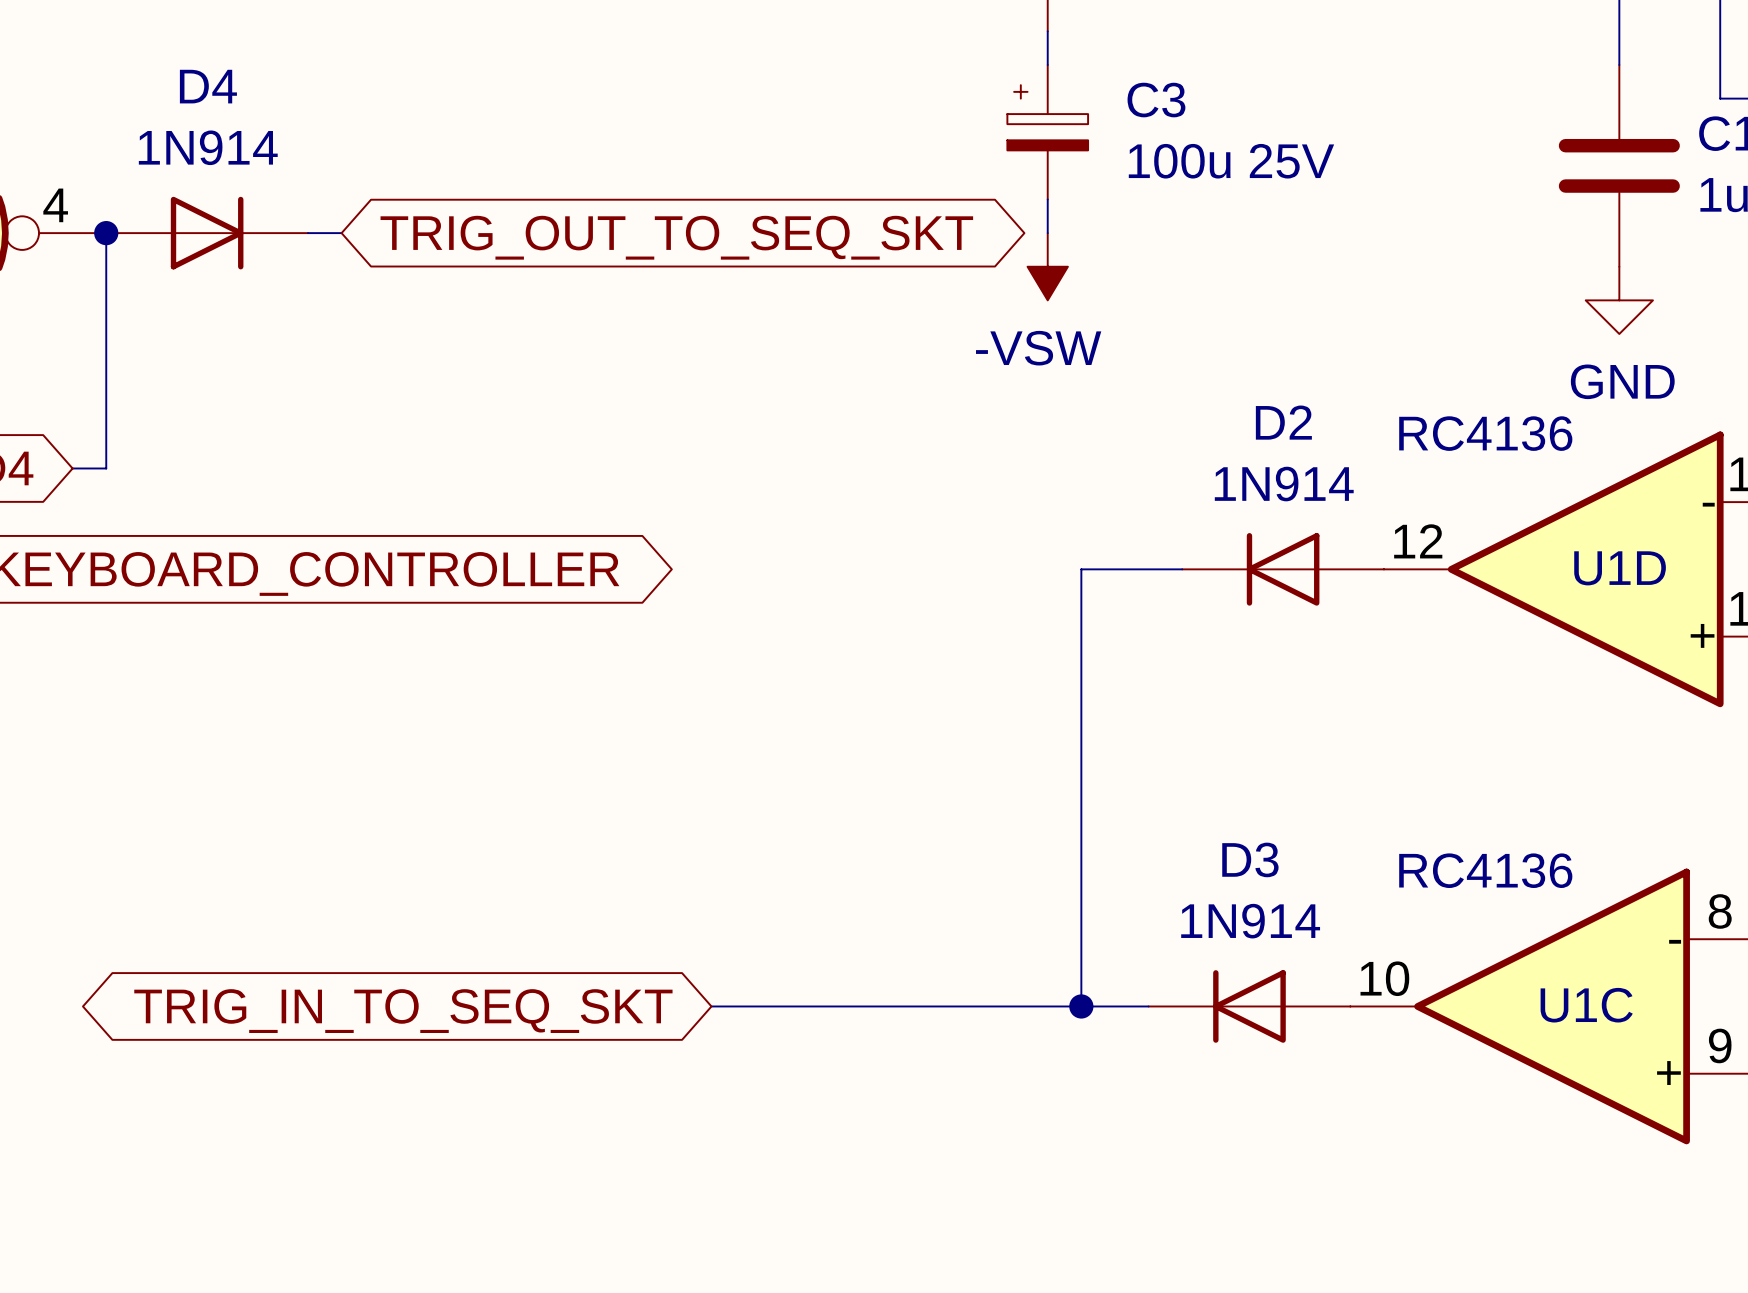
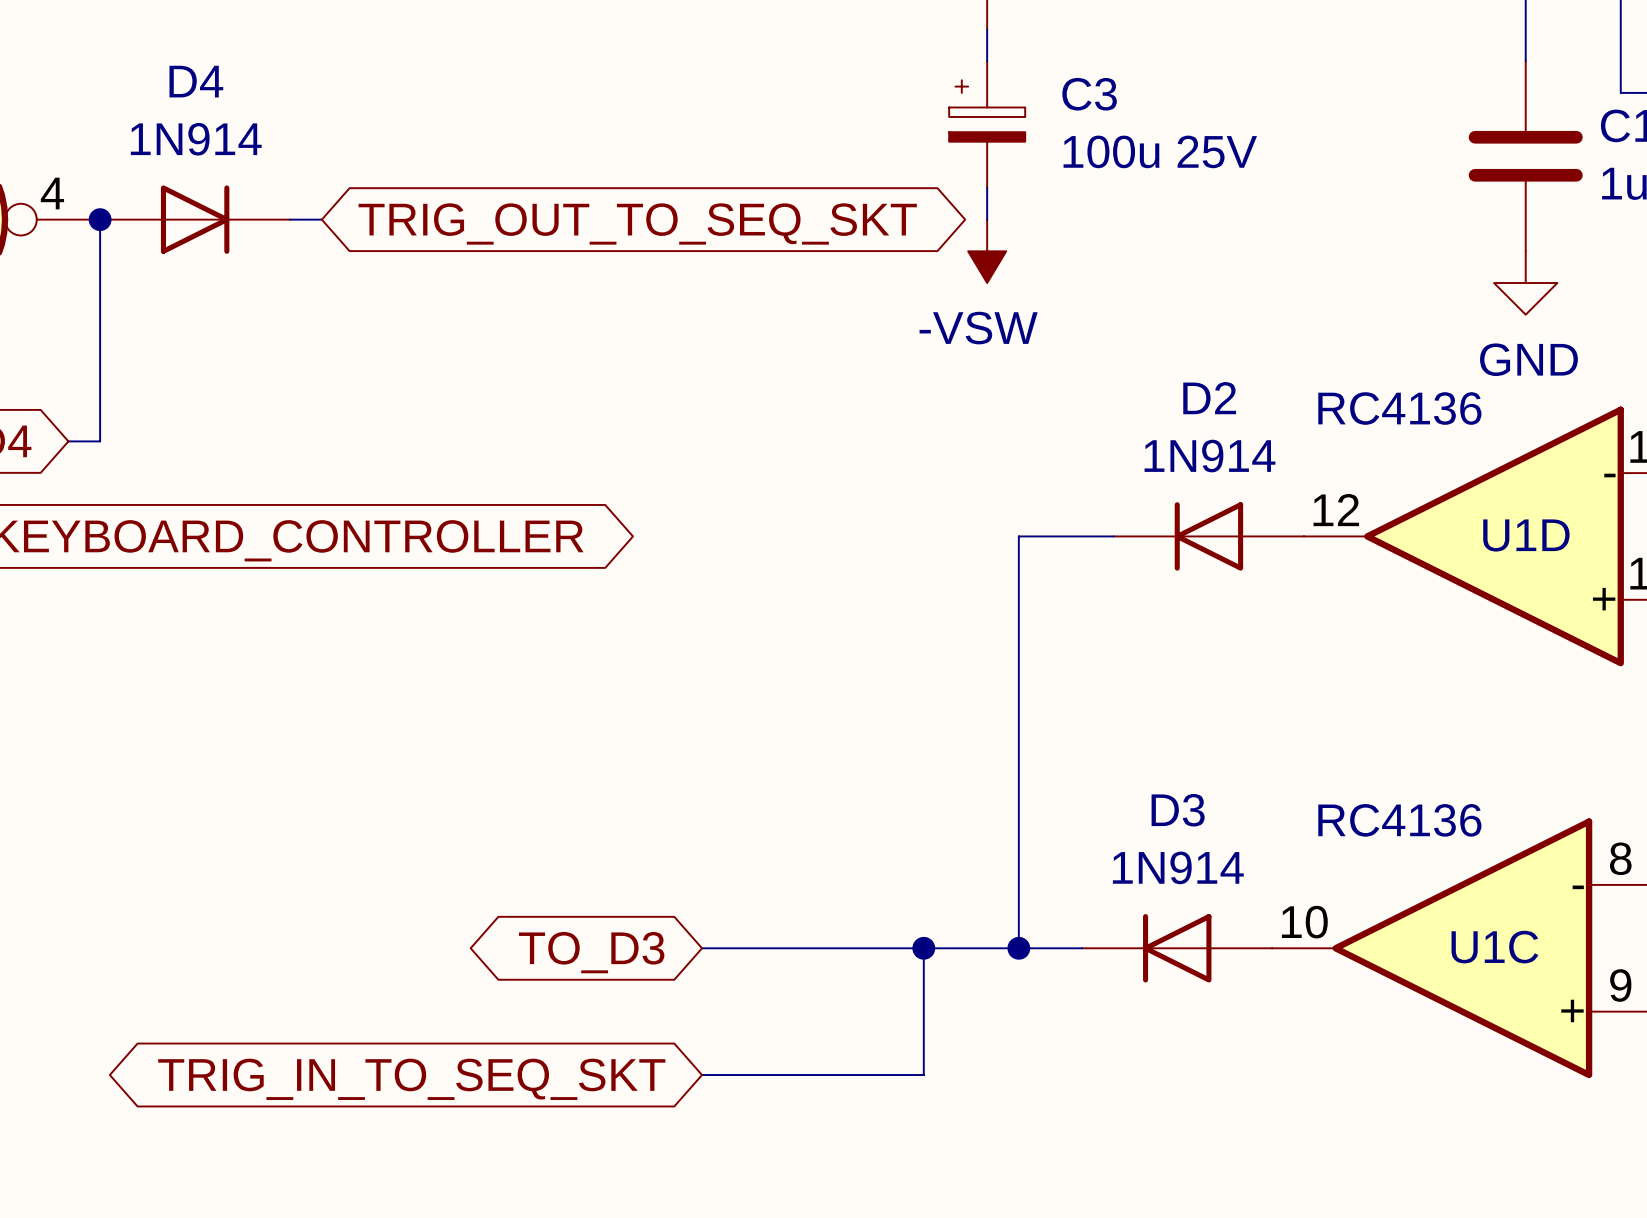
wire: (711, 1006) (745, 1006) -> none
wire: none -> (923, 948) (923, 1075) (702, 1075)
junction: none -> (923, 948)
global label position: TRIG_IN_TO_SEQ_SKT (403, 1011) -> TRIG_IN_TO_SEQ_SKT (411, 1079)
global label: none -> TO_D3 (591, 952)

